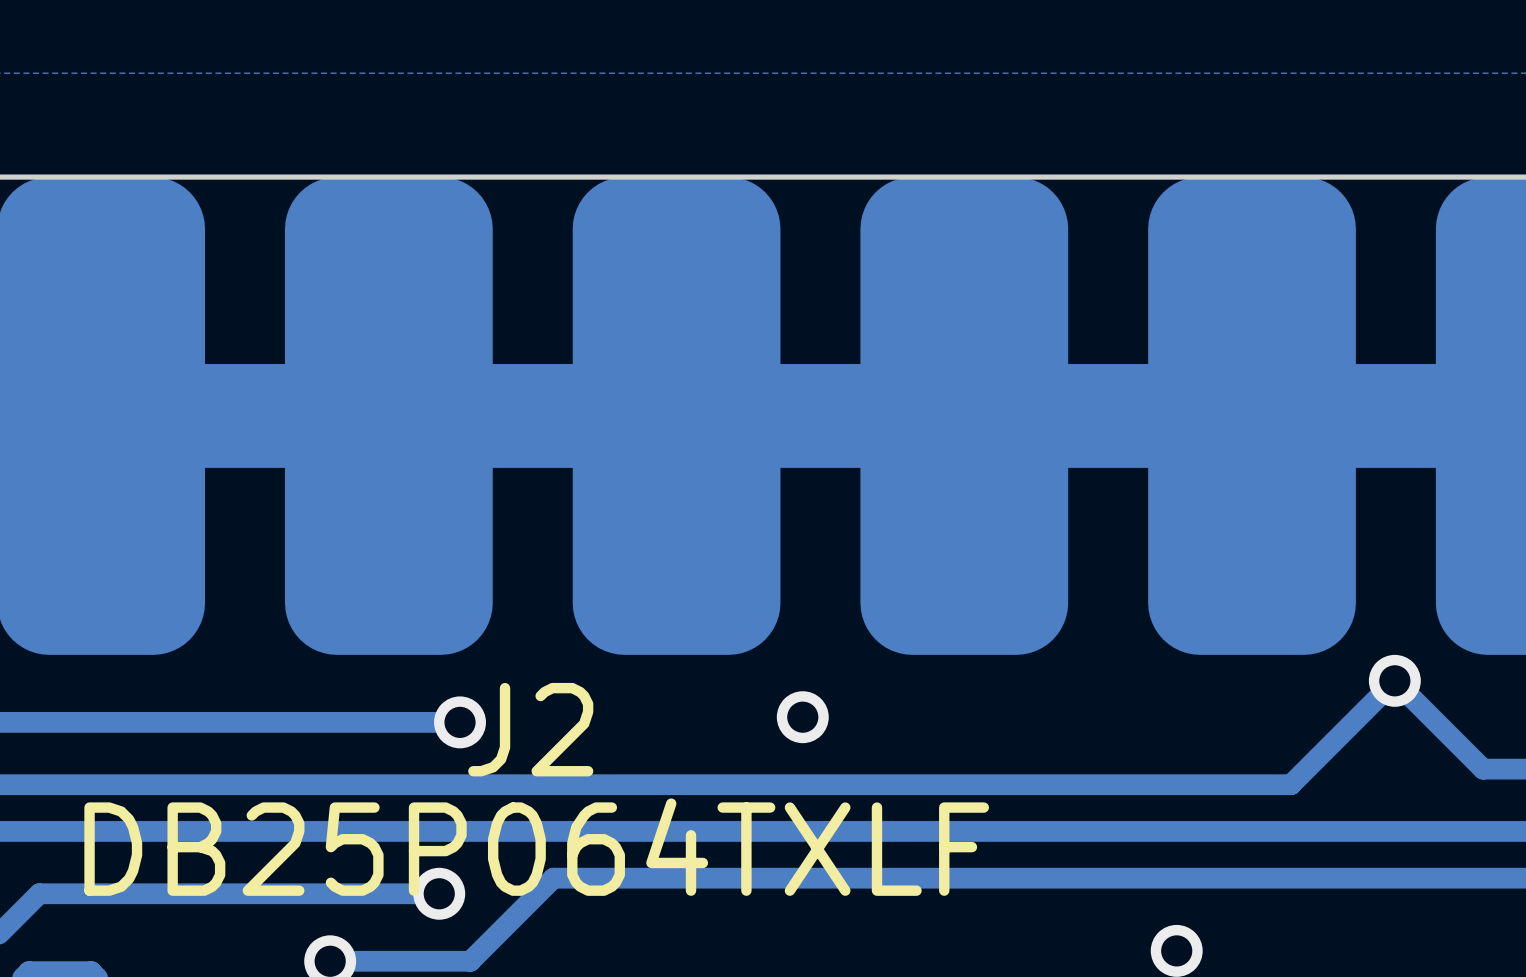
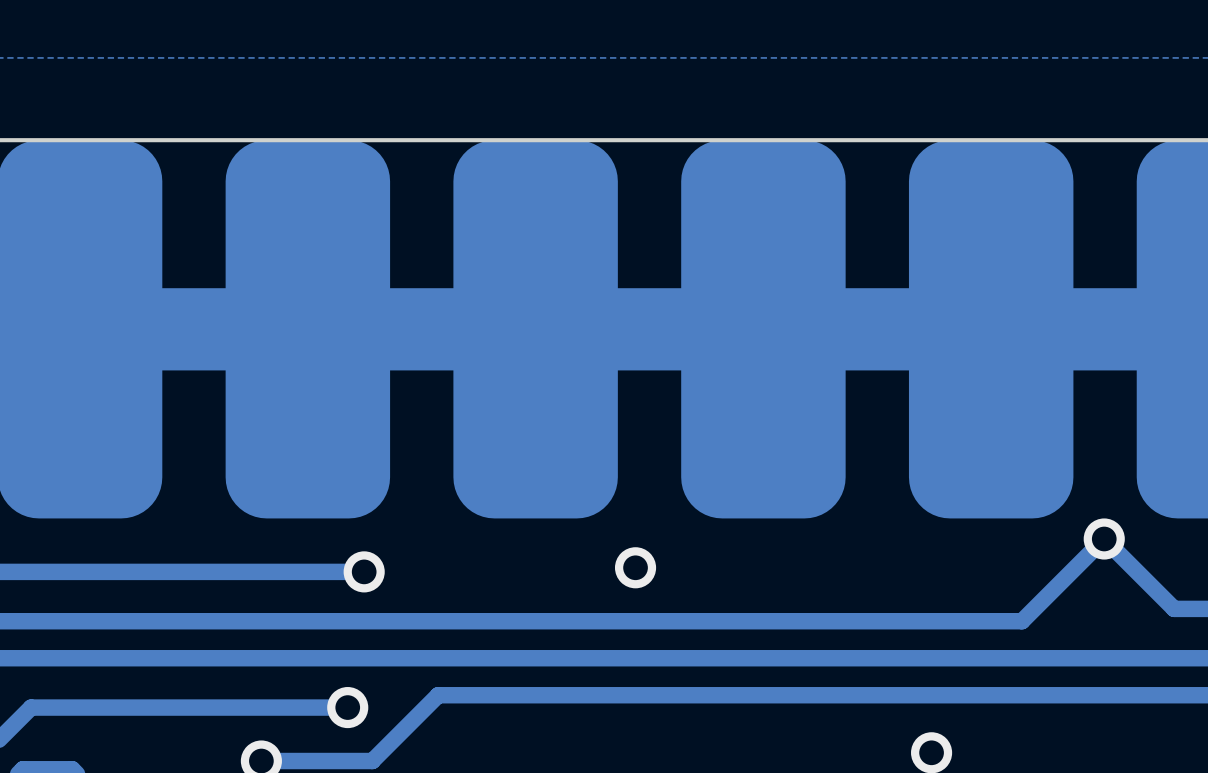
J2 name: J2 (530, 729) -> none
J2 value: DB25P064TXLF (536, 847) -> none

